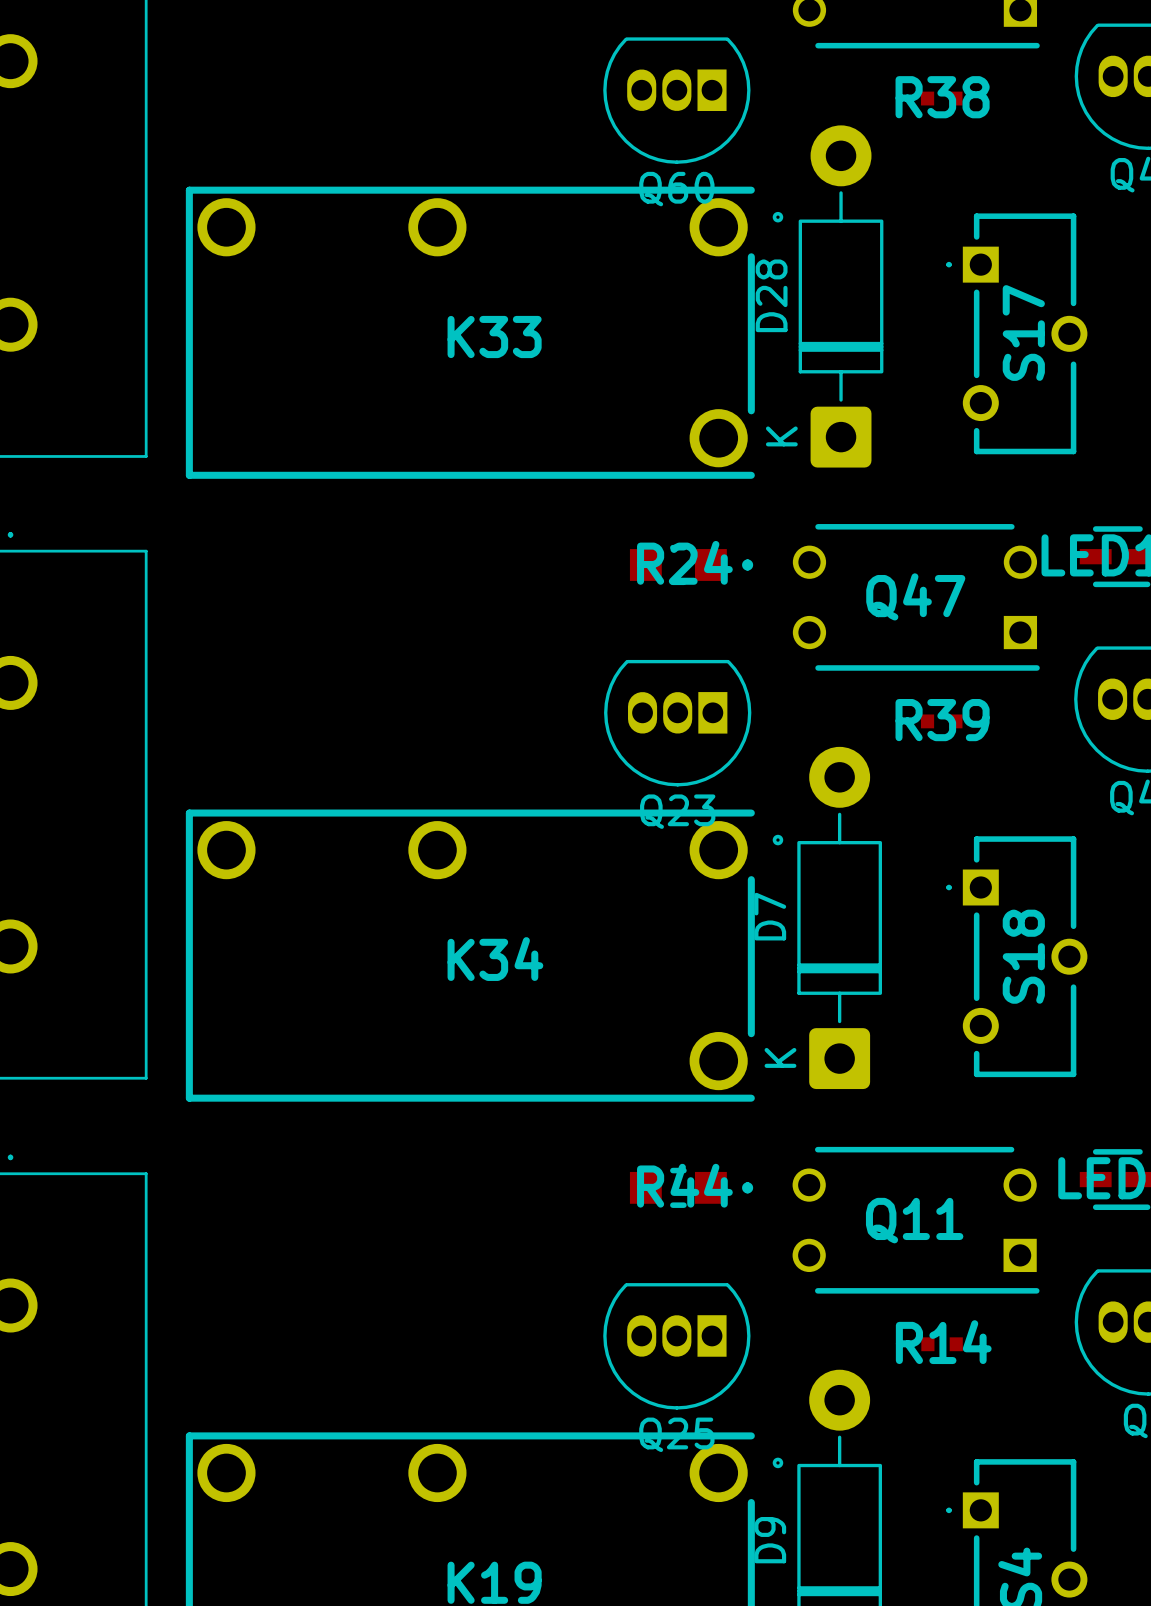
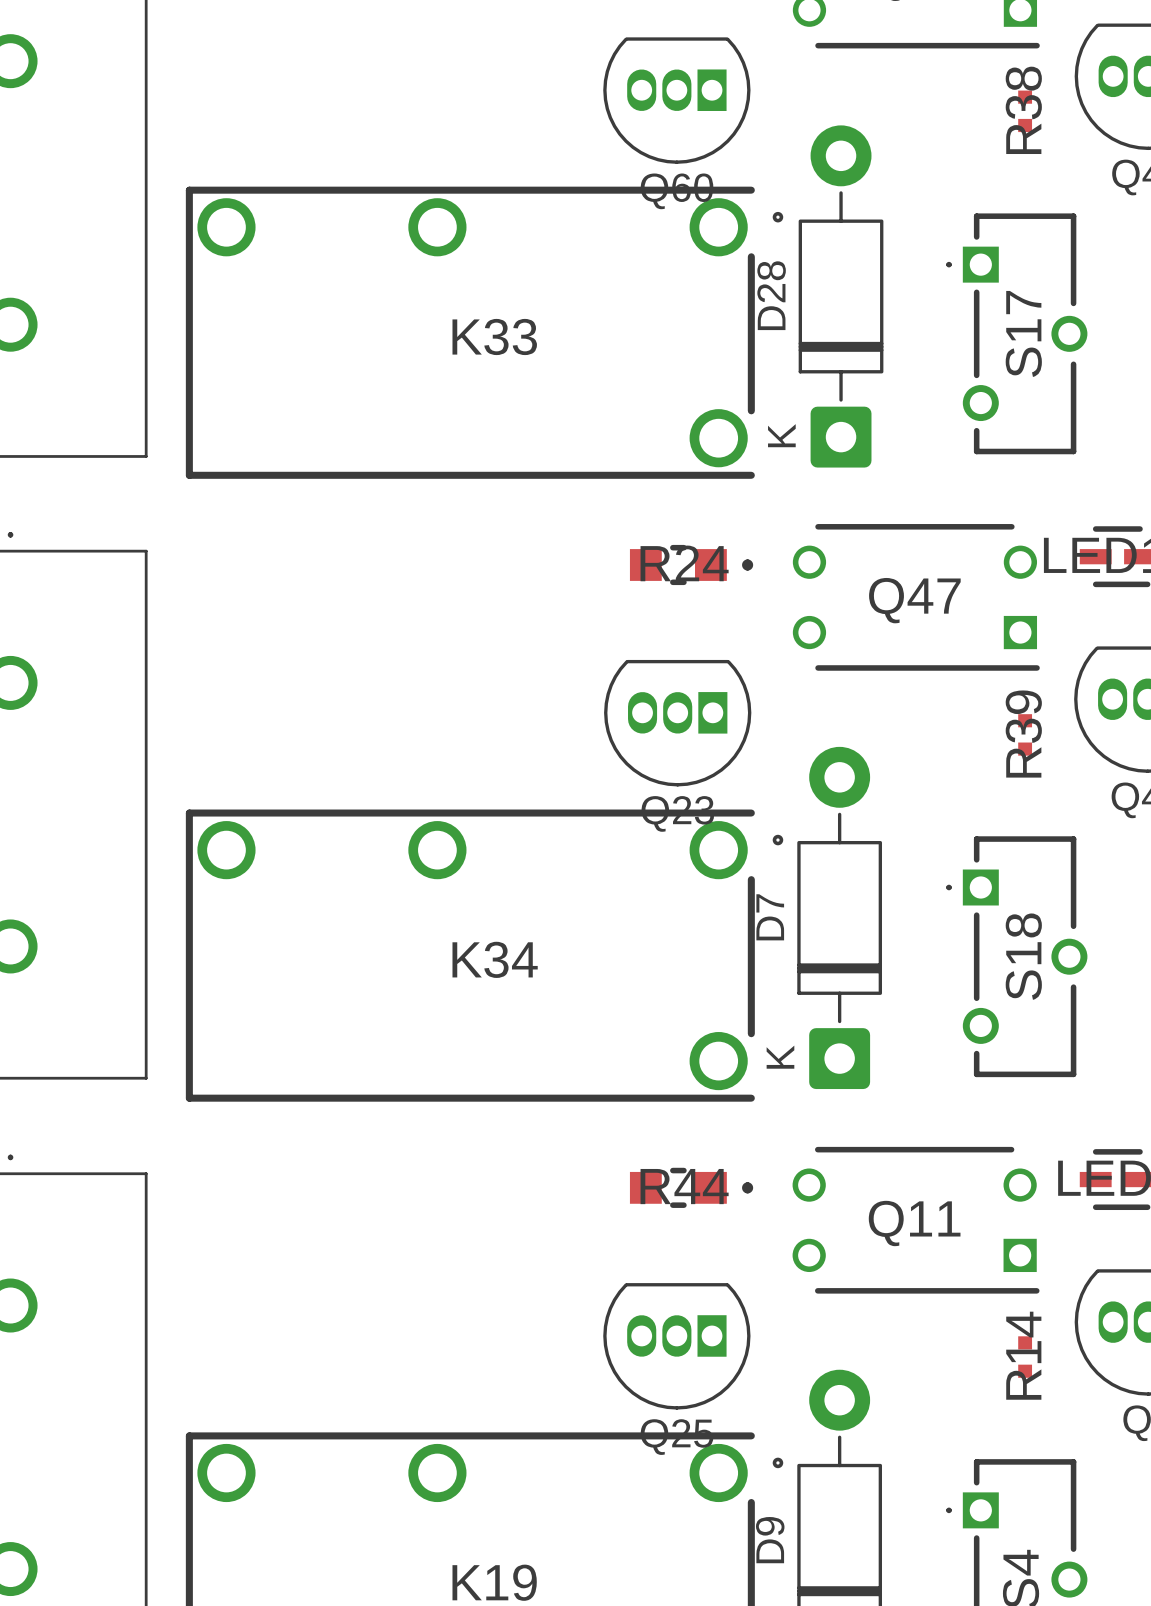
R38 rotation: 0° (941, 98) -> 90° clockwise (1025, 111)
R38 position: (941, 98) -> (1025, 111)
R39 rotation: 0° (941, 721) -> 90° clockwise (1025, 734)
R39 position: (941, 721) -> (1025, 734)
R14 rotation: 0° (942, 1344) -> 90° clockwise (1025, 1357)
R14 position: (942, 1344) -> (1025, 1357)

